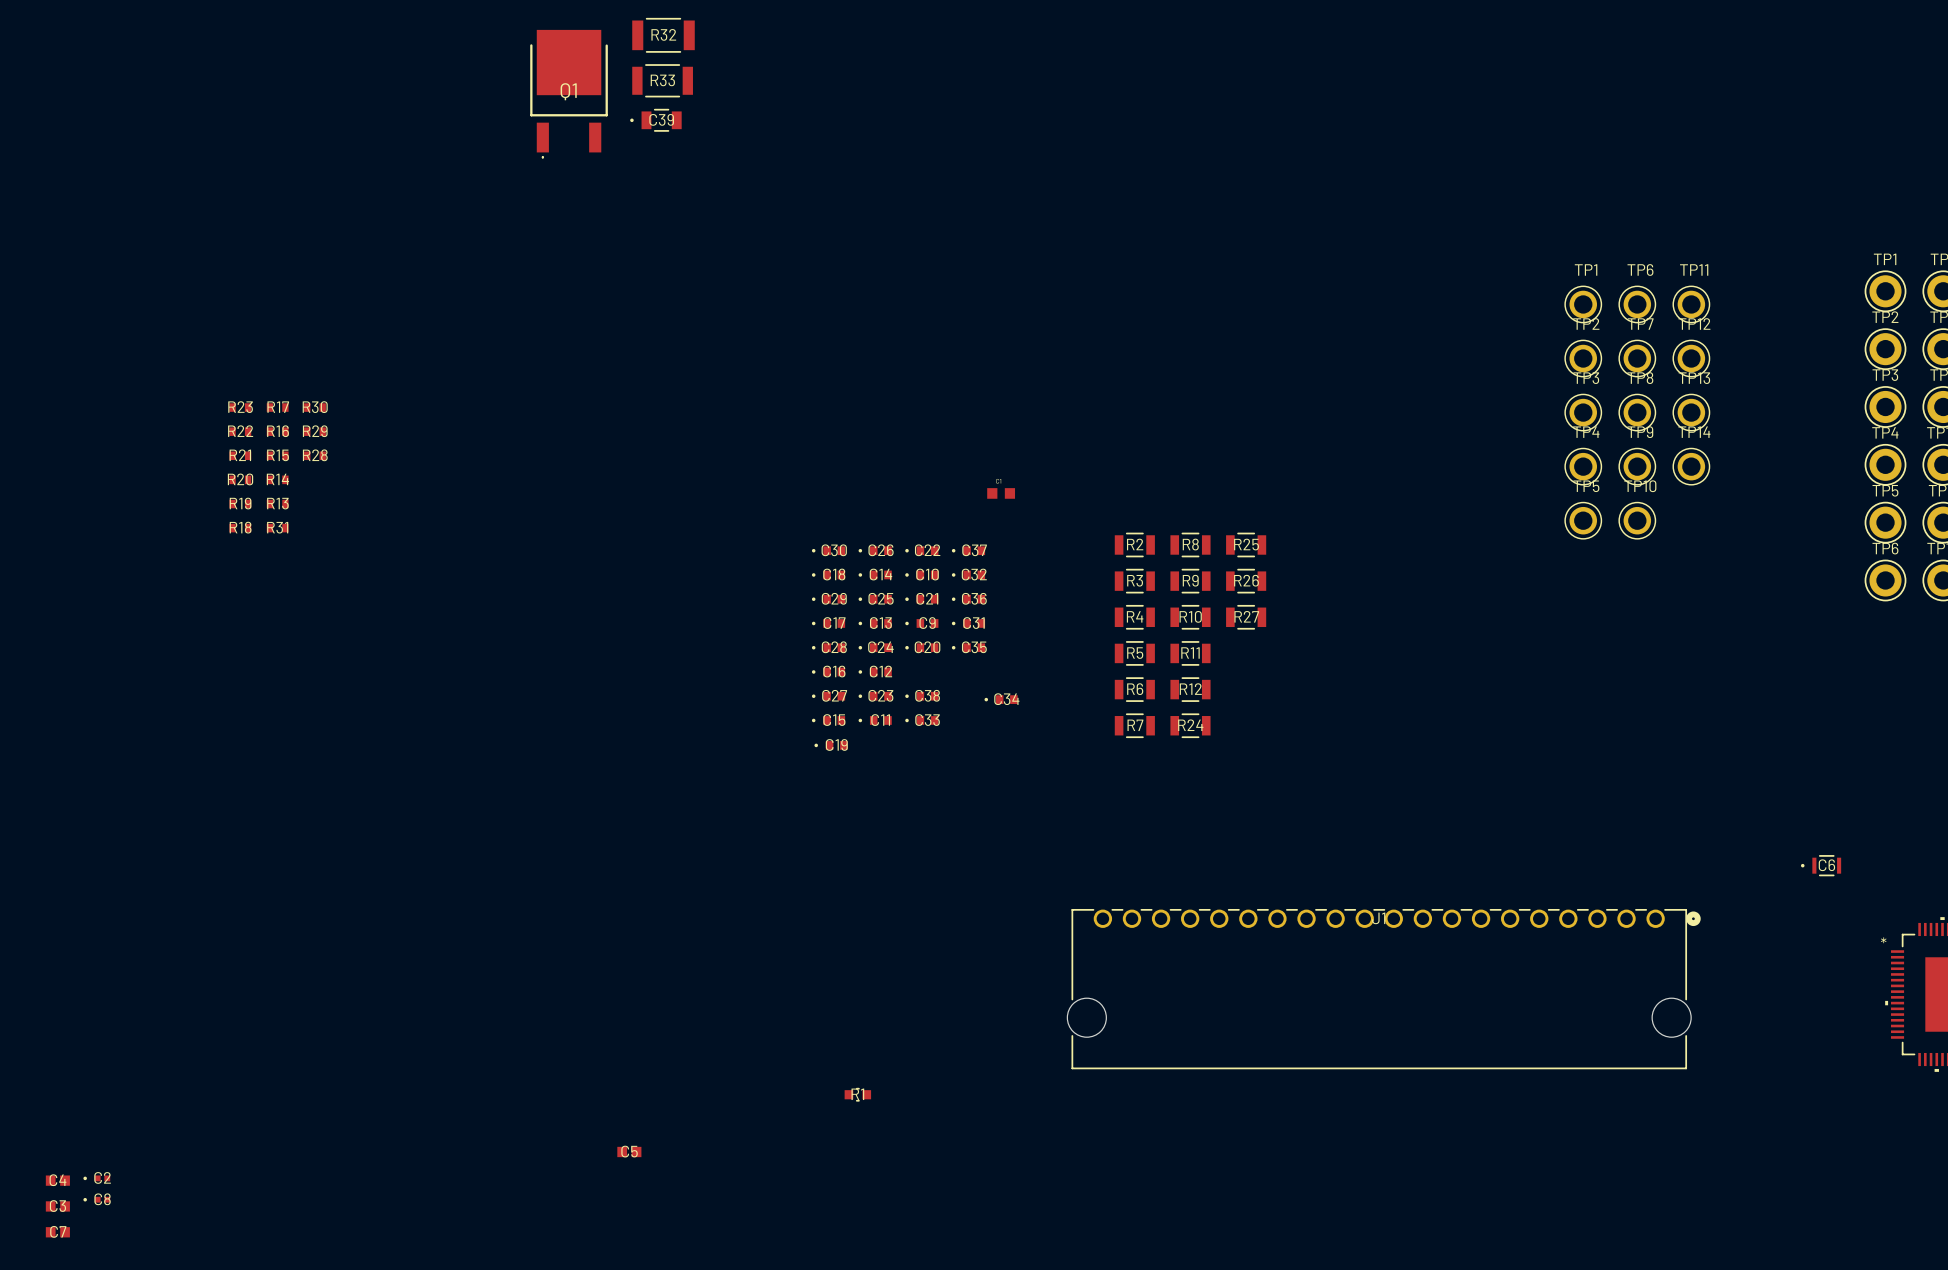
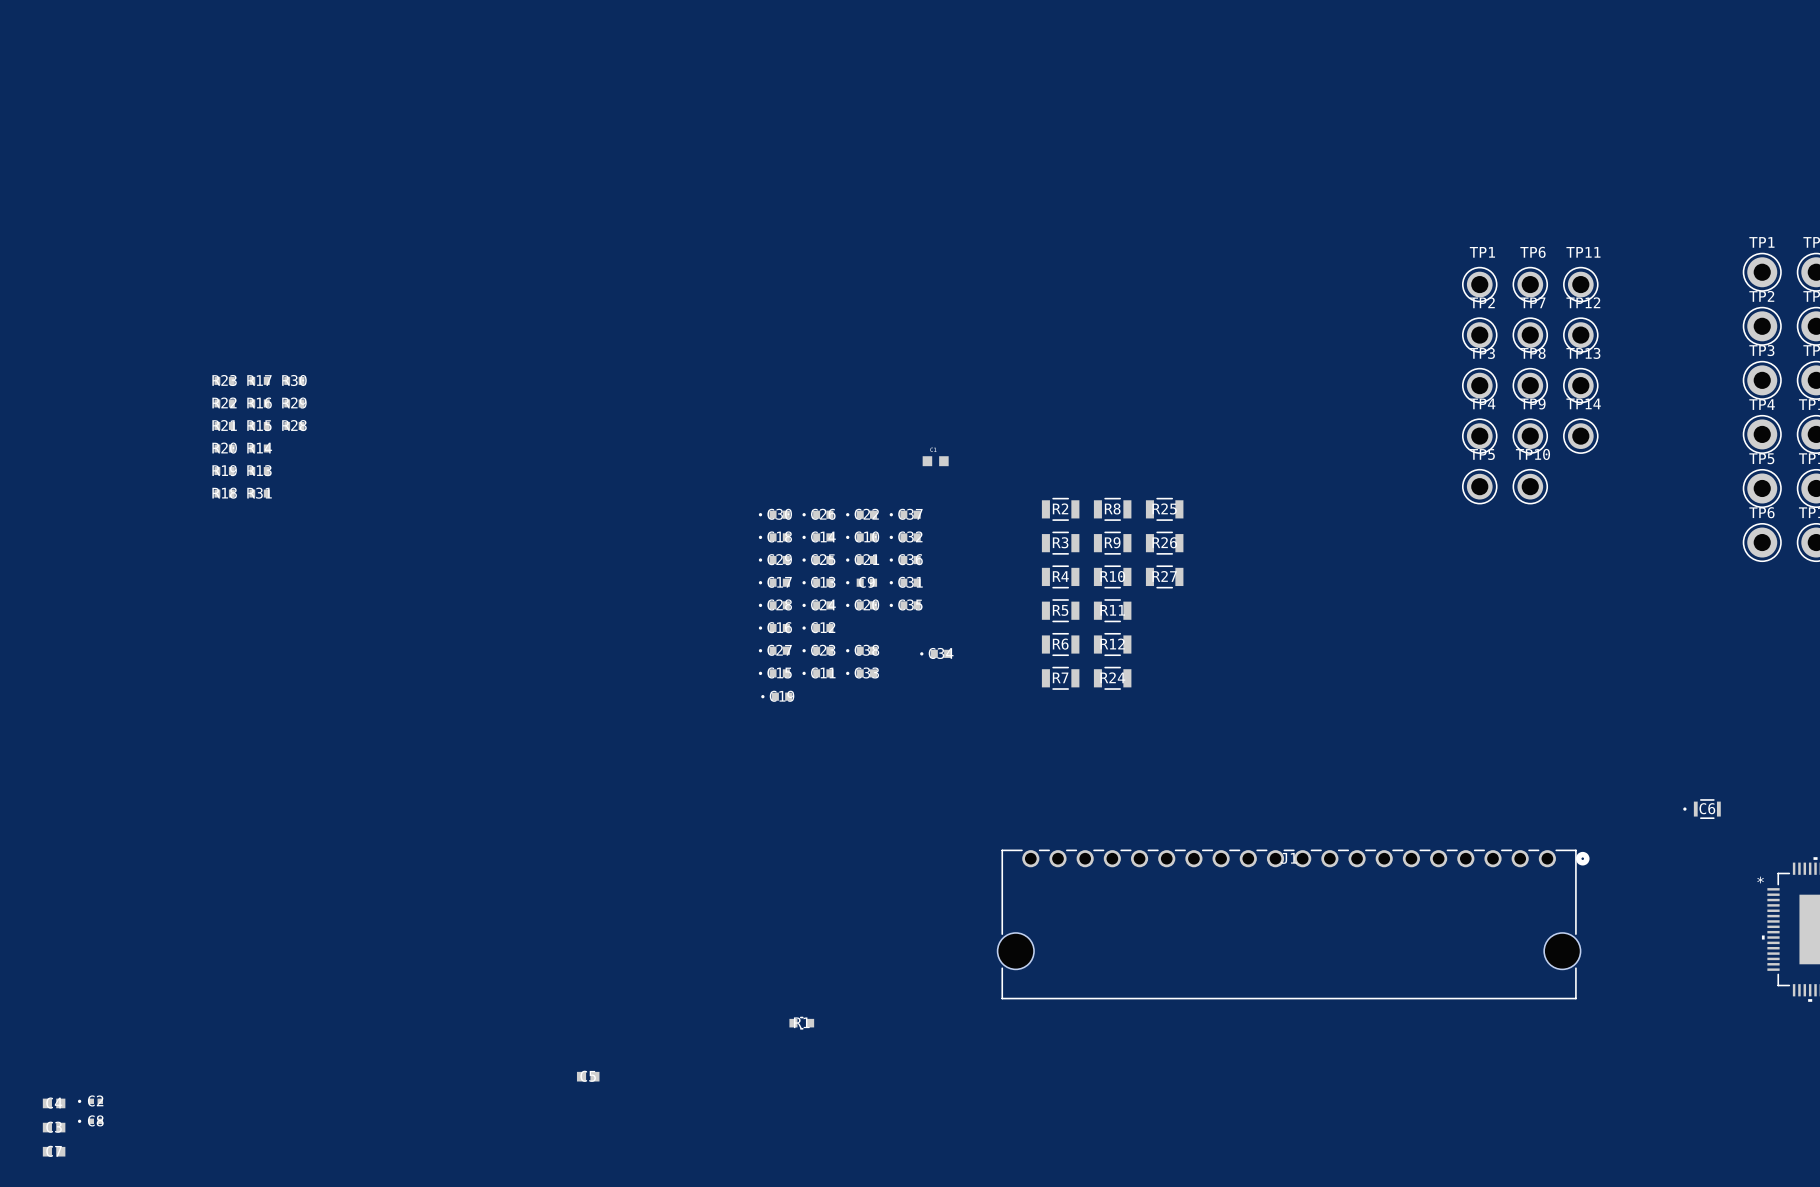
R32: (663, 35) -> none
R33: (662, 80) -> none
Q1: (569, 94) -> none
C39: (655, 120) -> none

